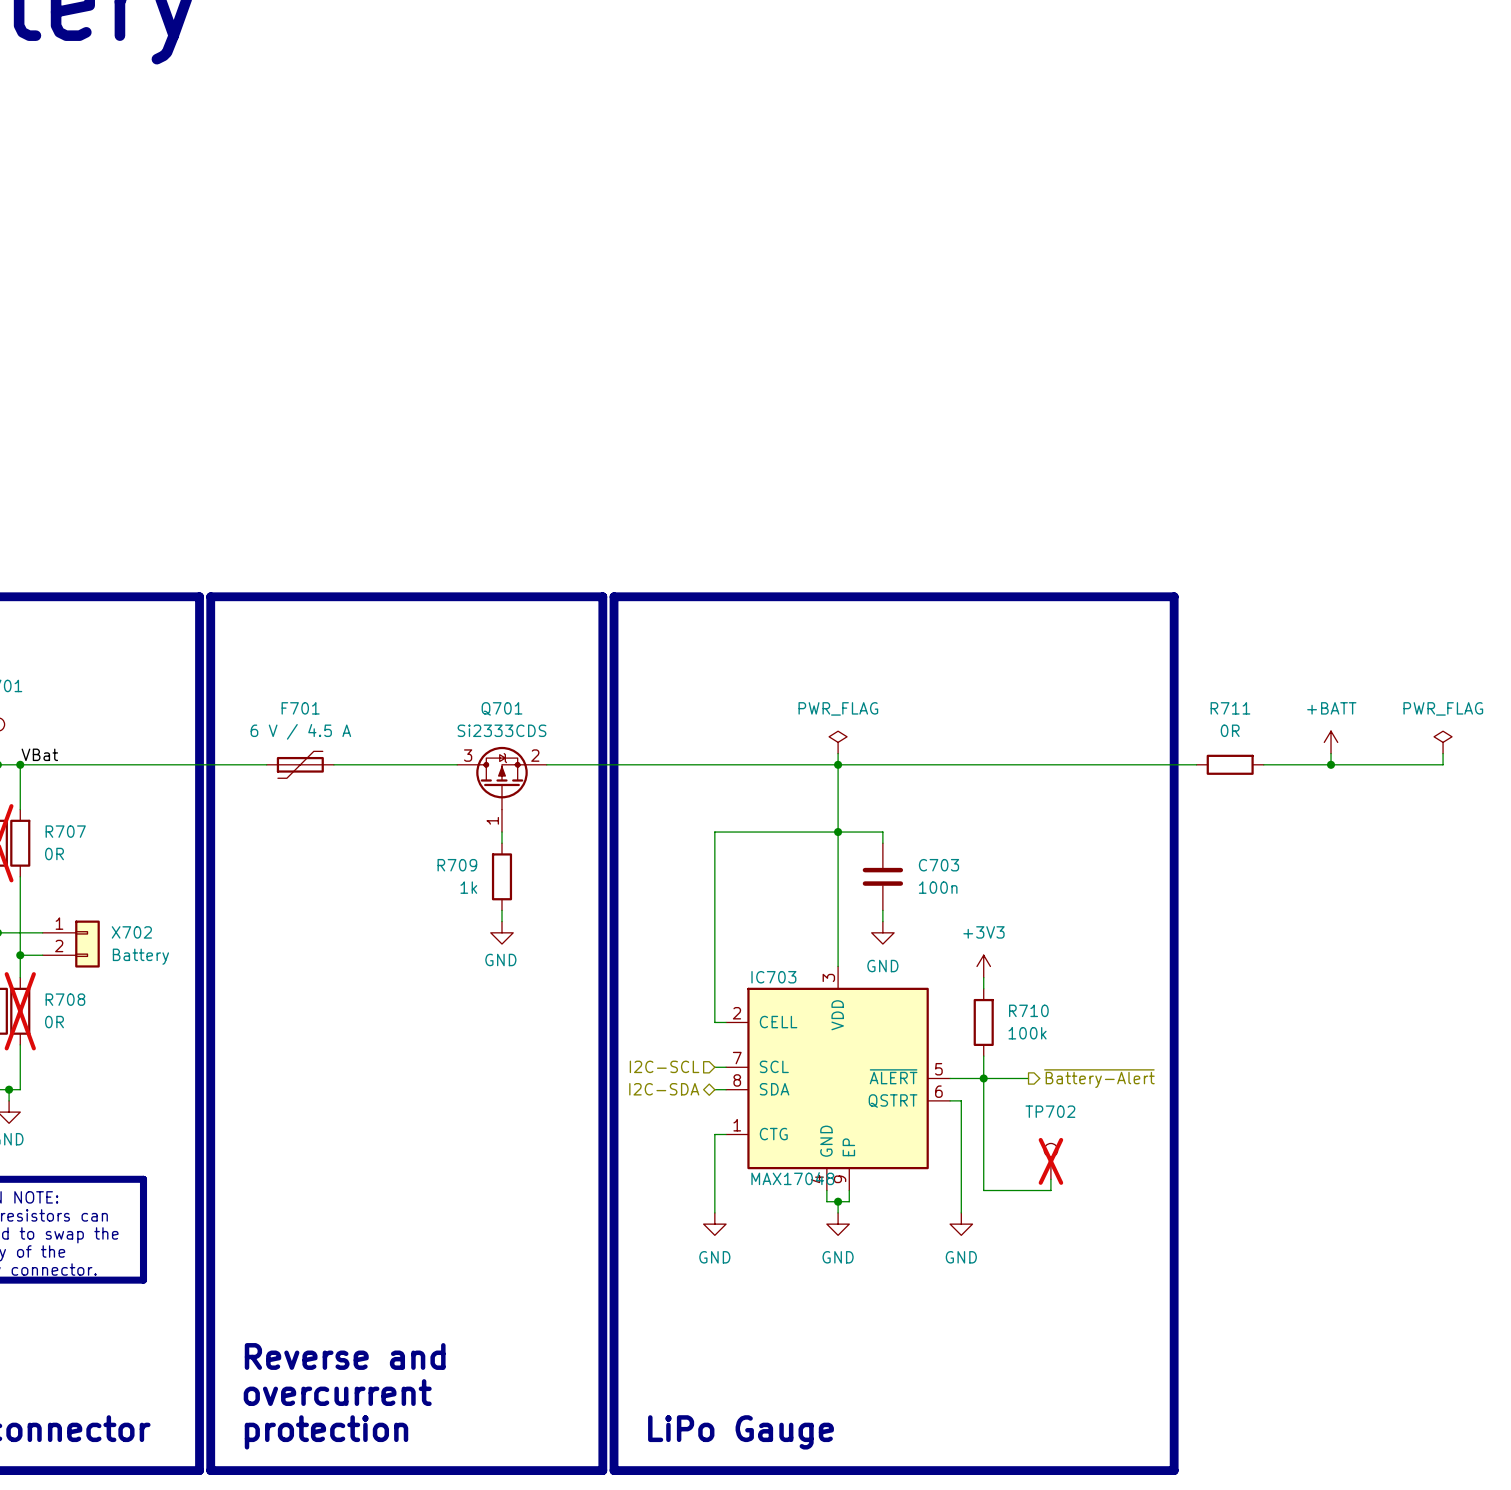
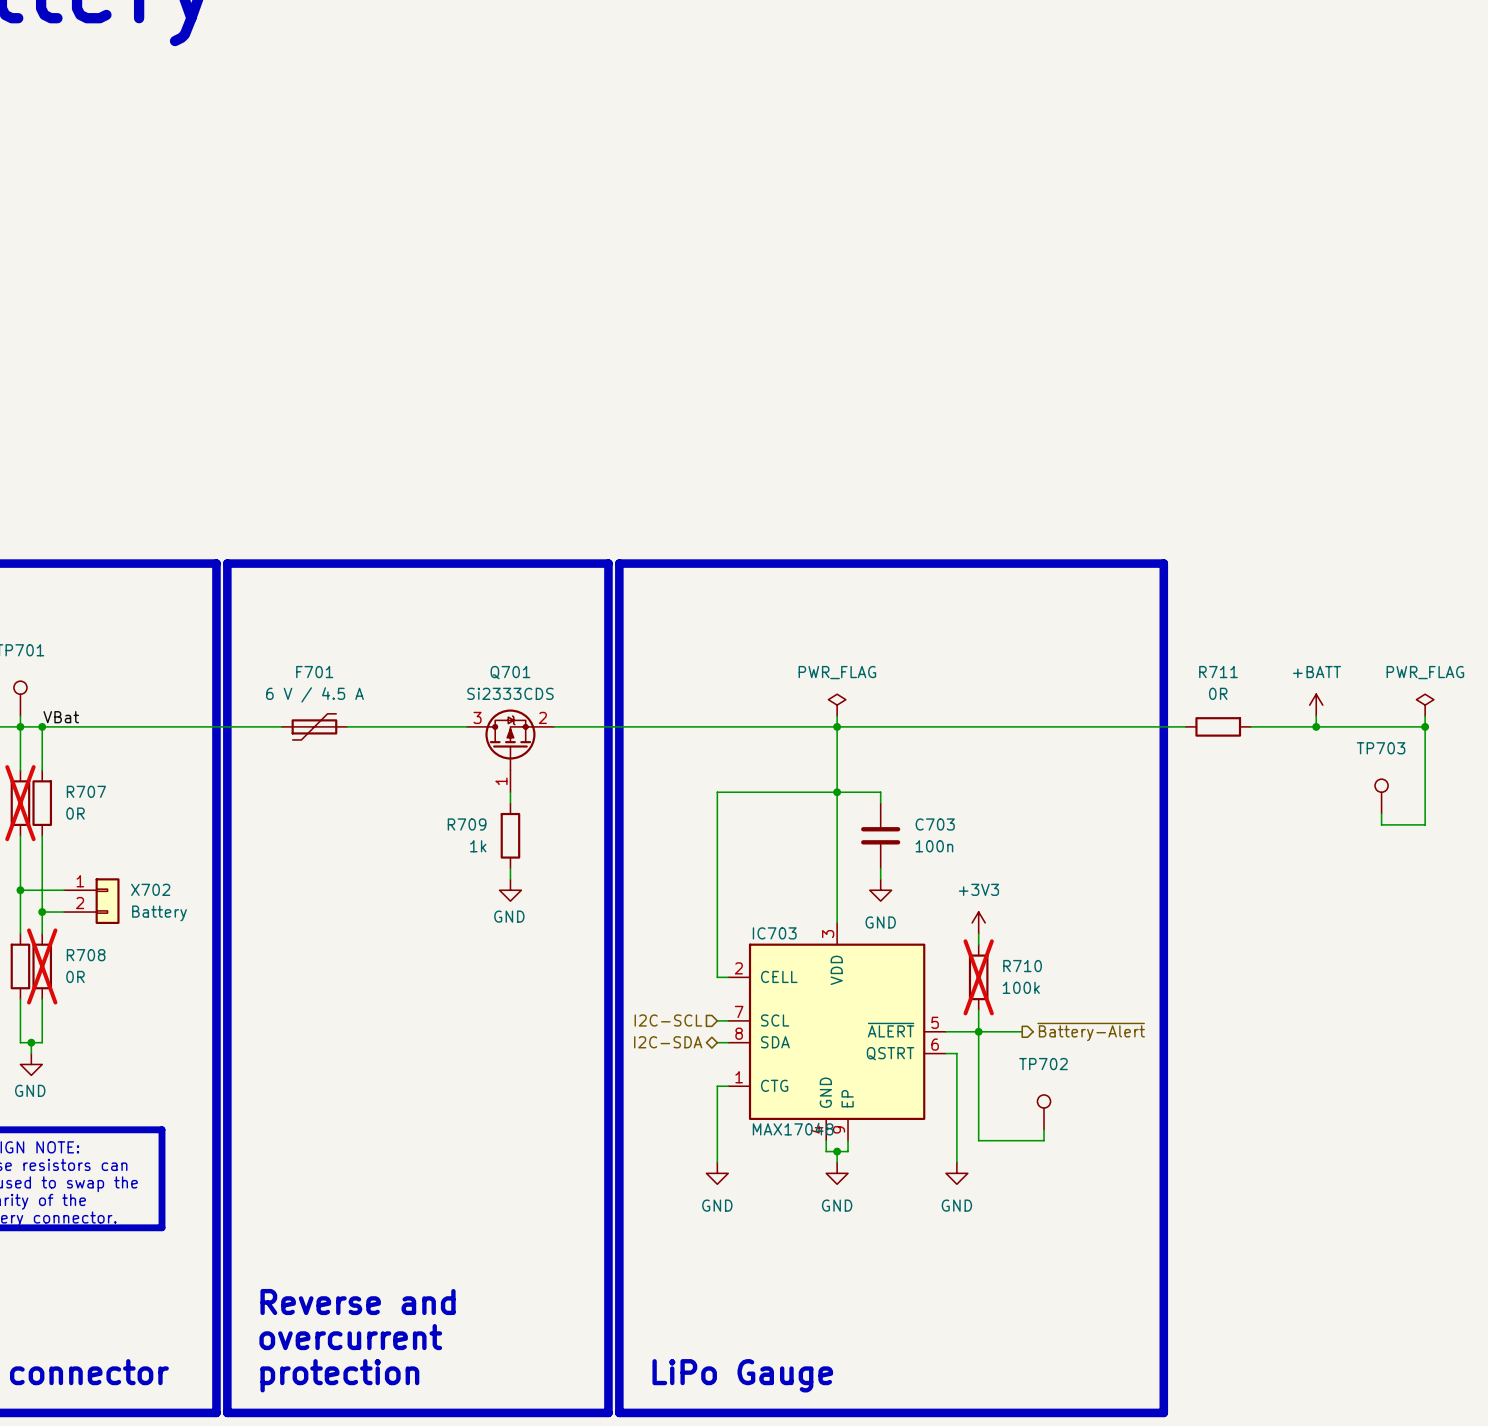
wire: none -> (1425, 726) (1425, 824) (1381, 824) (1381, 814)
junction: none -> (1425, 726)
TP703: none -> (1381, 796)
R710 do-not-place cross: none -> (978, 977)
TP702 do-not-place cross: (1050, 1161) -> none

